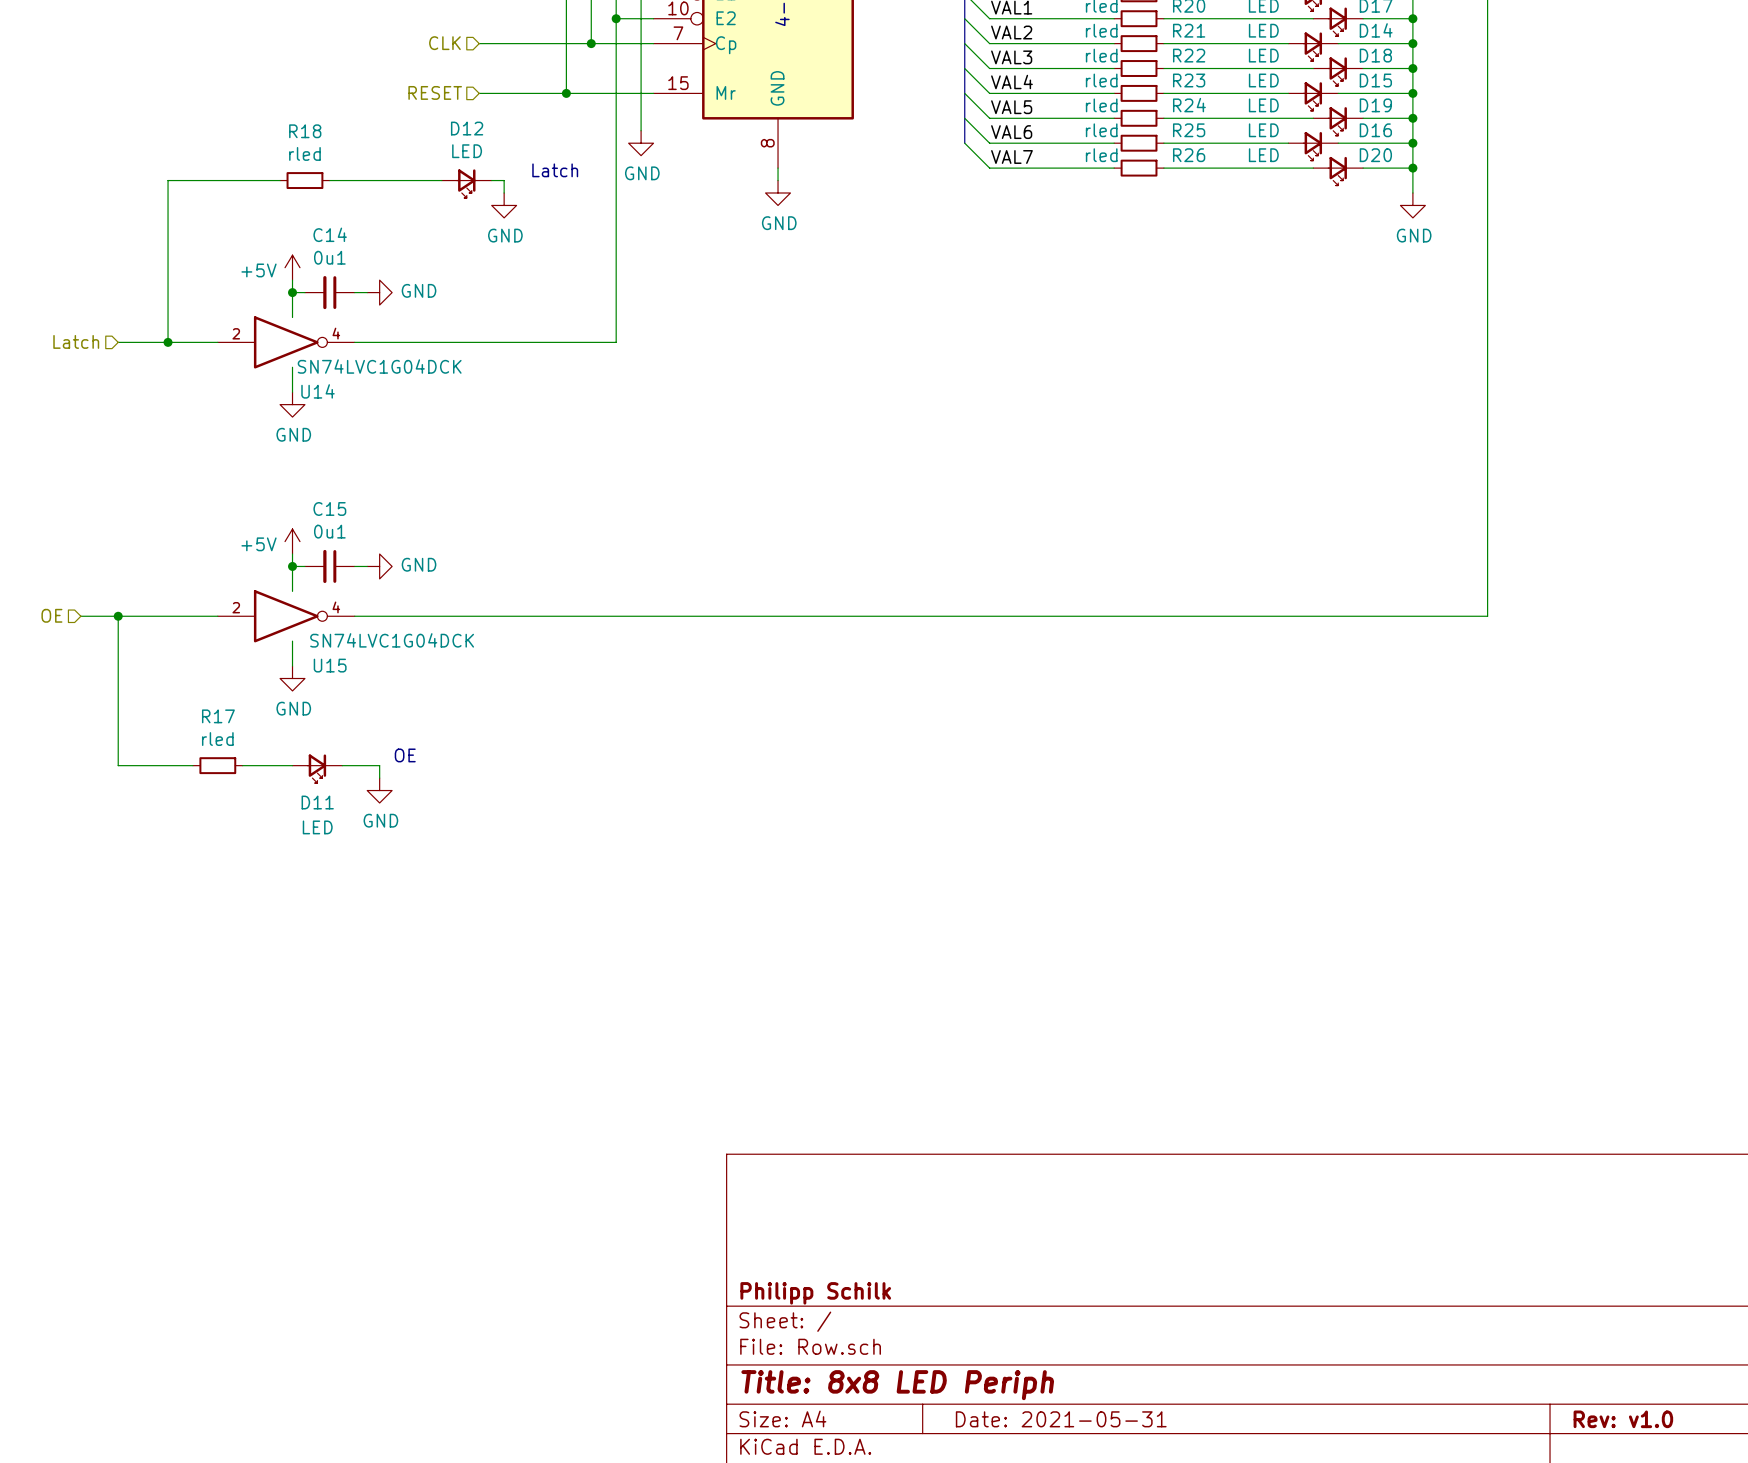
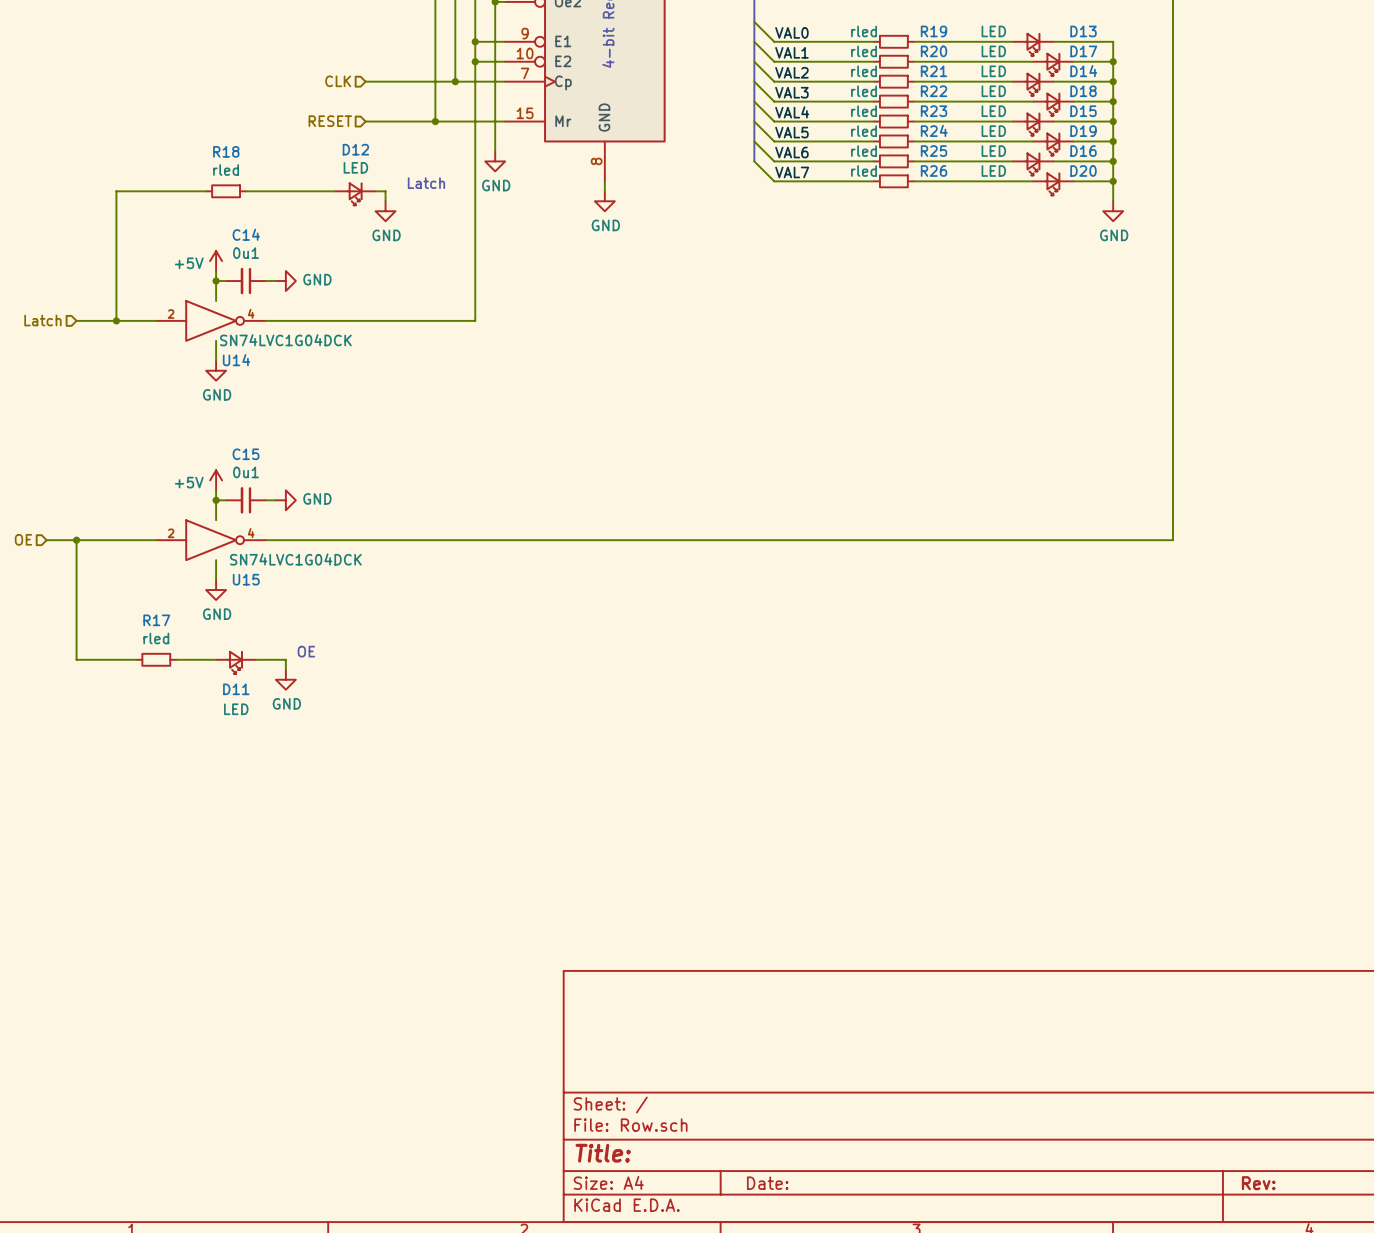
title block: Philipp Schilk (815, 1293) -> none
title block: Title: 8x8 LED Periph (897, 1385) -> Title: (603, 1153)
title block: Date: 2021-05-31 (1061, 1419) -> Date: (767, 1183)
title block: Rev: v1.0 (1623, 1419) -> Rev: (1258, 1183)

